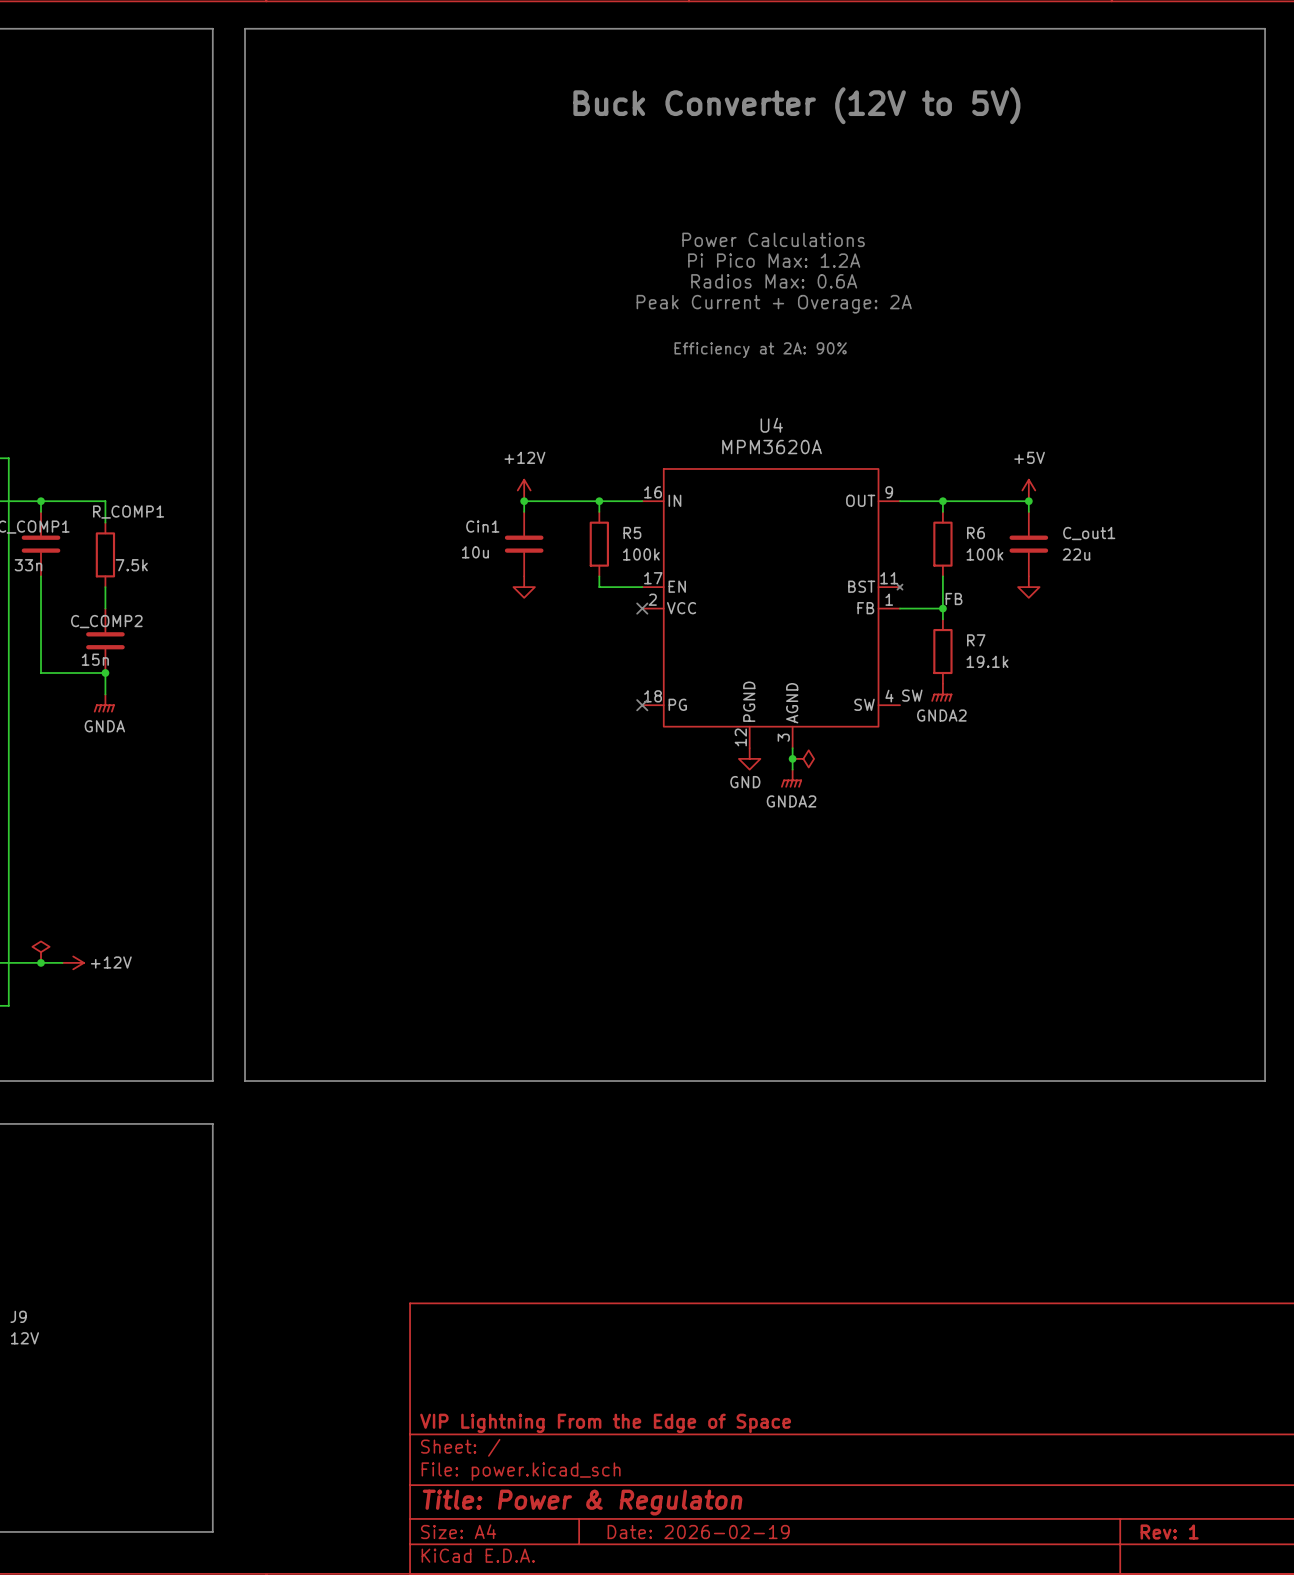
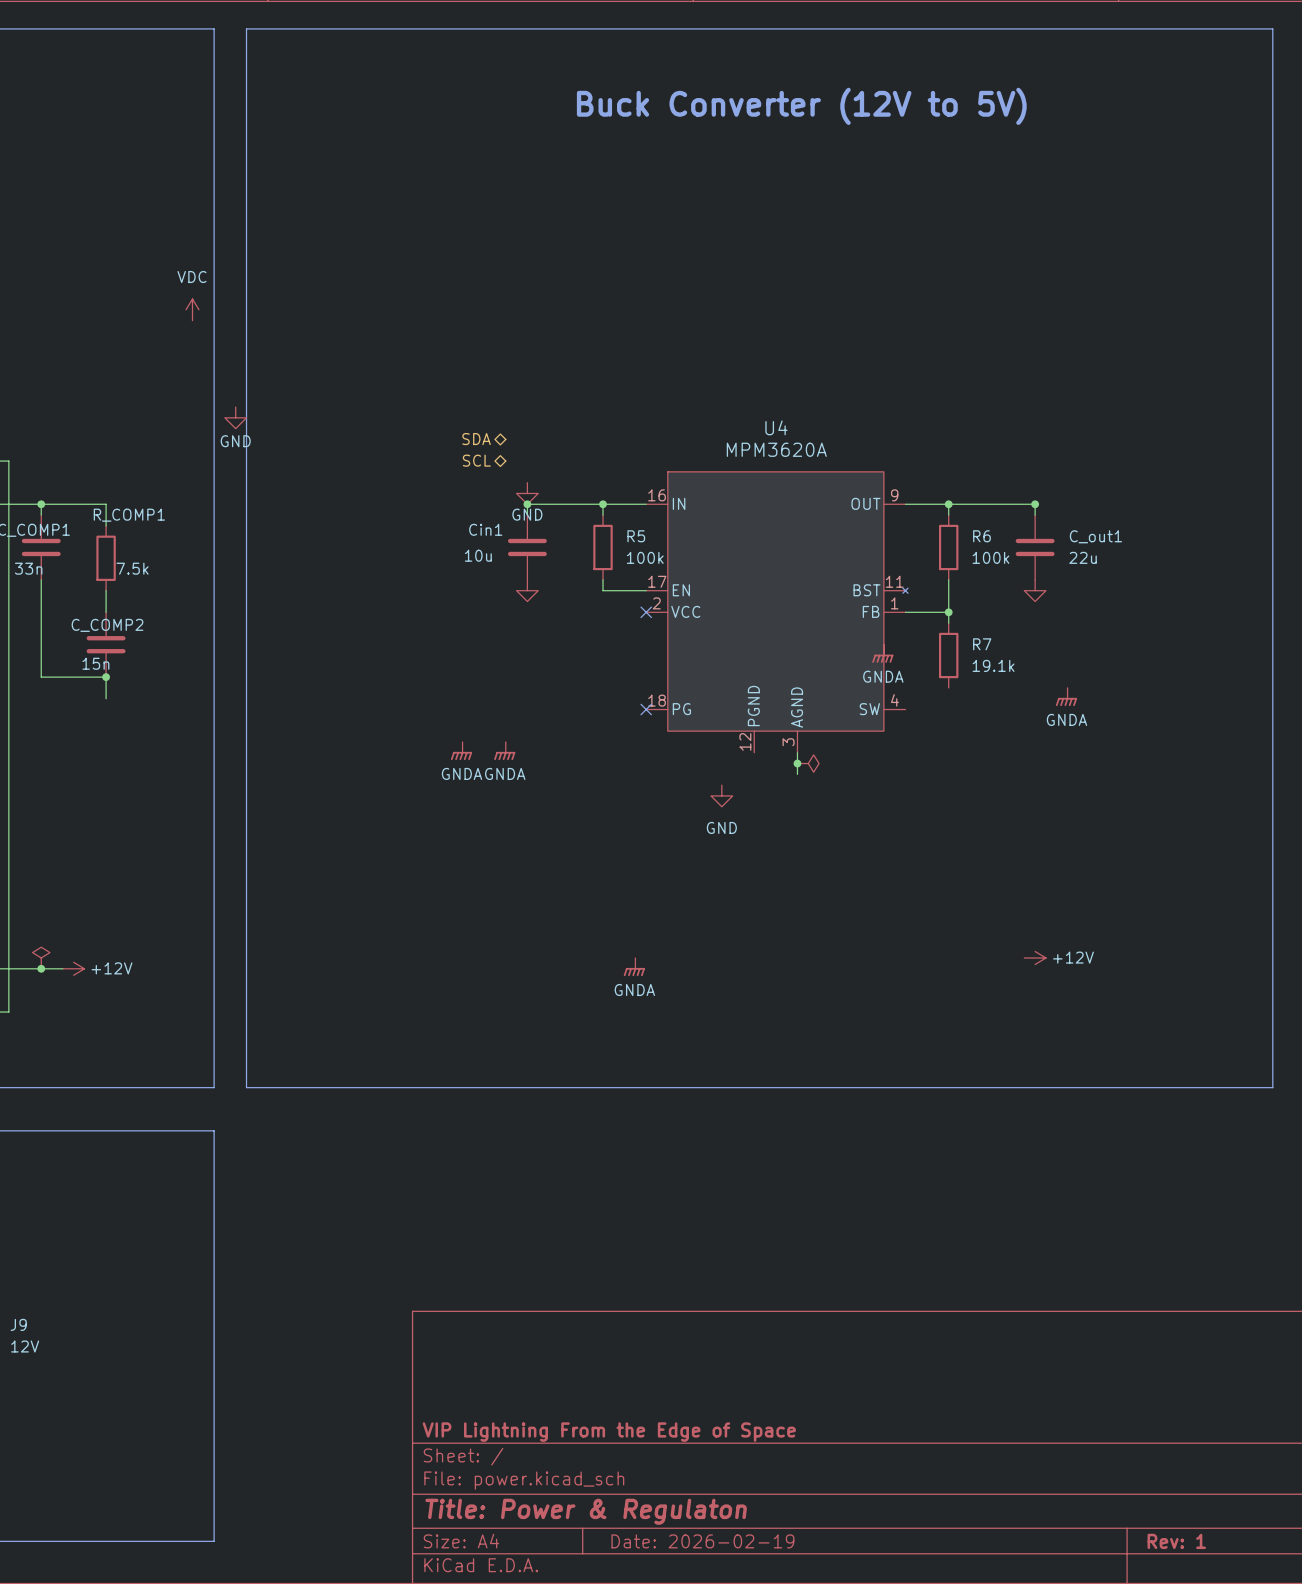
text: Power Calculations (773, 239) -> none
text: Pi Pico Max: 1.2A (774, 260) -> none
text: Radios Max: 0.6A (774, 281) -> none
text: Peak Current + Overage: 2A (774, 304) -> none
power symbol: none -> VDC (192, 309)
text: Efficiency at 2A: 90% (760, 350) -> none
power symbol: none -> GND (235, 417)
hierarchical label: none -> SDA (476, 439)
hierarchical label: none -> SCL (476, 460)
power symbol: +12V (524, 490) -> GND (527, 493)
power symbol: +5V (1028, 490) -> none
label: FB (954, 598) -> none
power symbol: none -> GNDA (882, 653)
power symbol: GNDA2 (941, 692) -> none
power symbol: none -> GNDA (1066, 696)
label: SW (912, 695) -> none
power symbol: GNDA (104, 703) -> none
power symbol: none -> GNDA (461, 751)
power symbol: none -> GNDA (504, 751)
power symbol position: GND (749, 758) -> GND (721, 795)
power symbol: GNDA2 (791, 778) -> none
power symbol text position: GND (745, 782) -> GND (721, 827)
power symbol: none -> +12V (1035, 957)
power symbol: none -> GNDA (634, 967)

